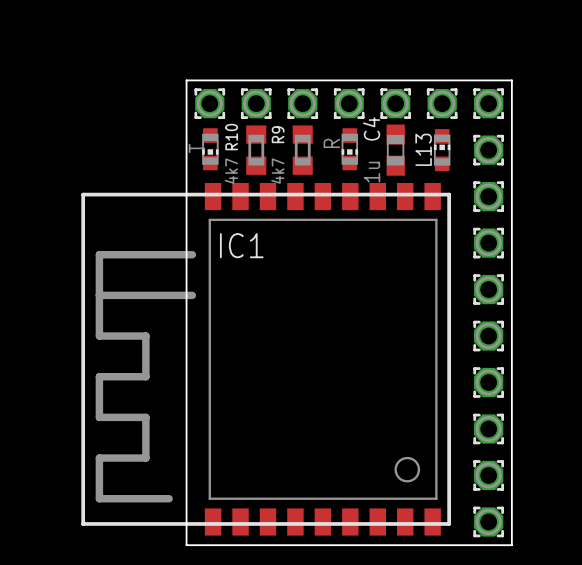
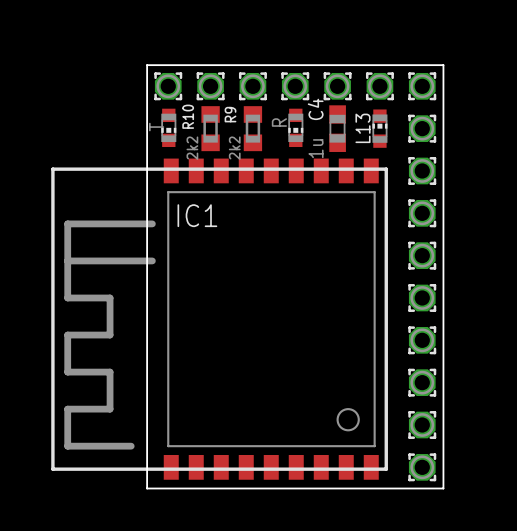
R10 value: 4k7 (231, 171) -> 2k2 (192, 148)
R9 value: 4k7 (277, 171) -> 2k2 (234, 148)

